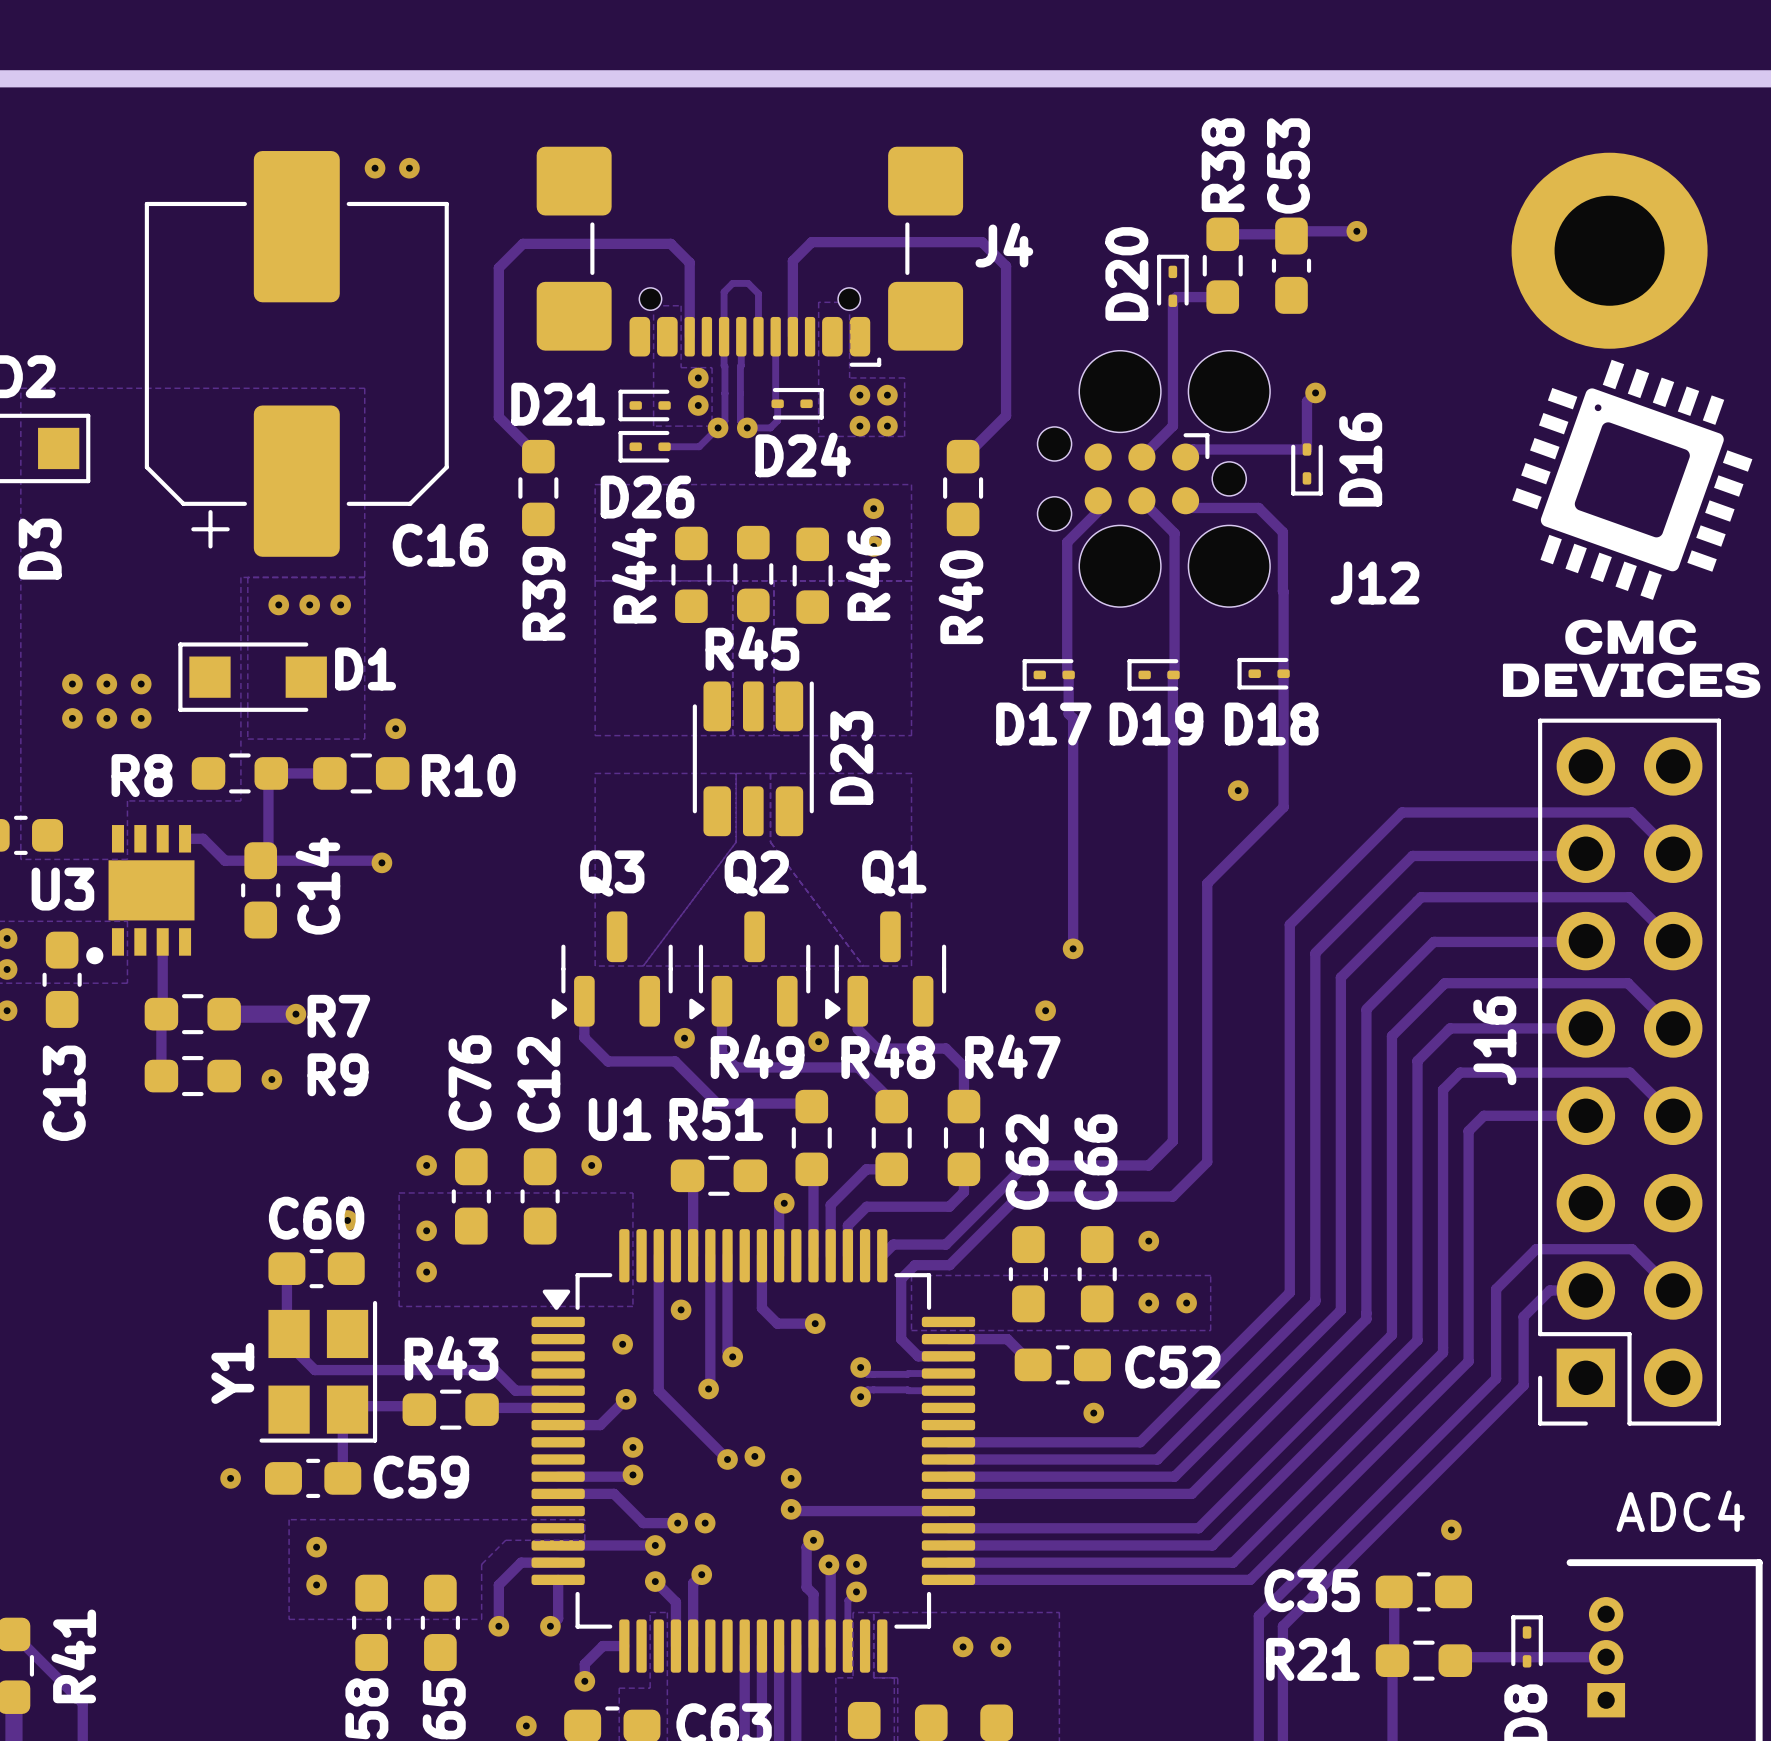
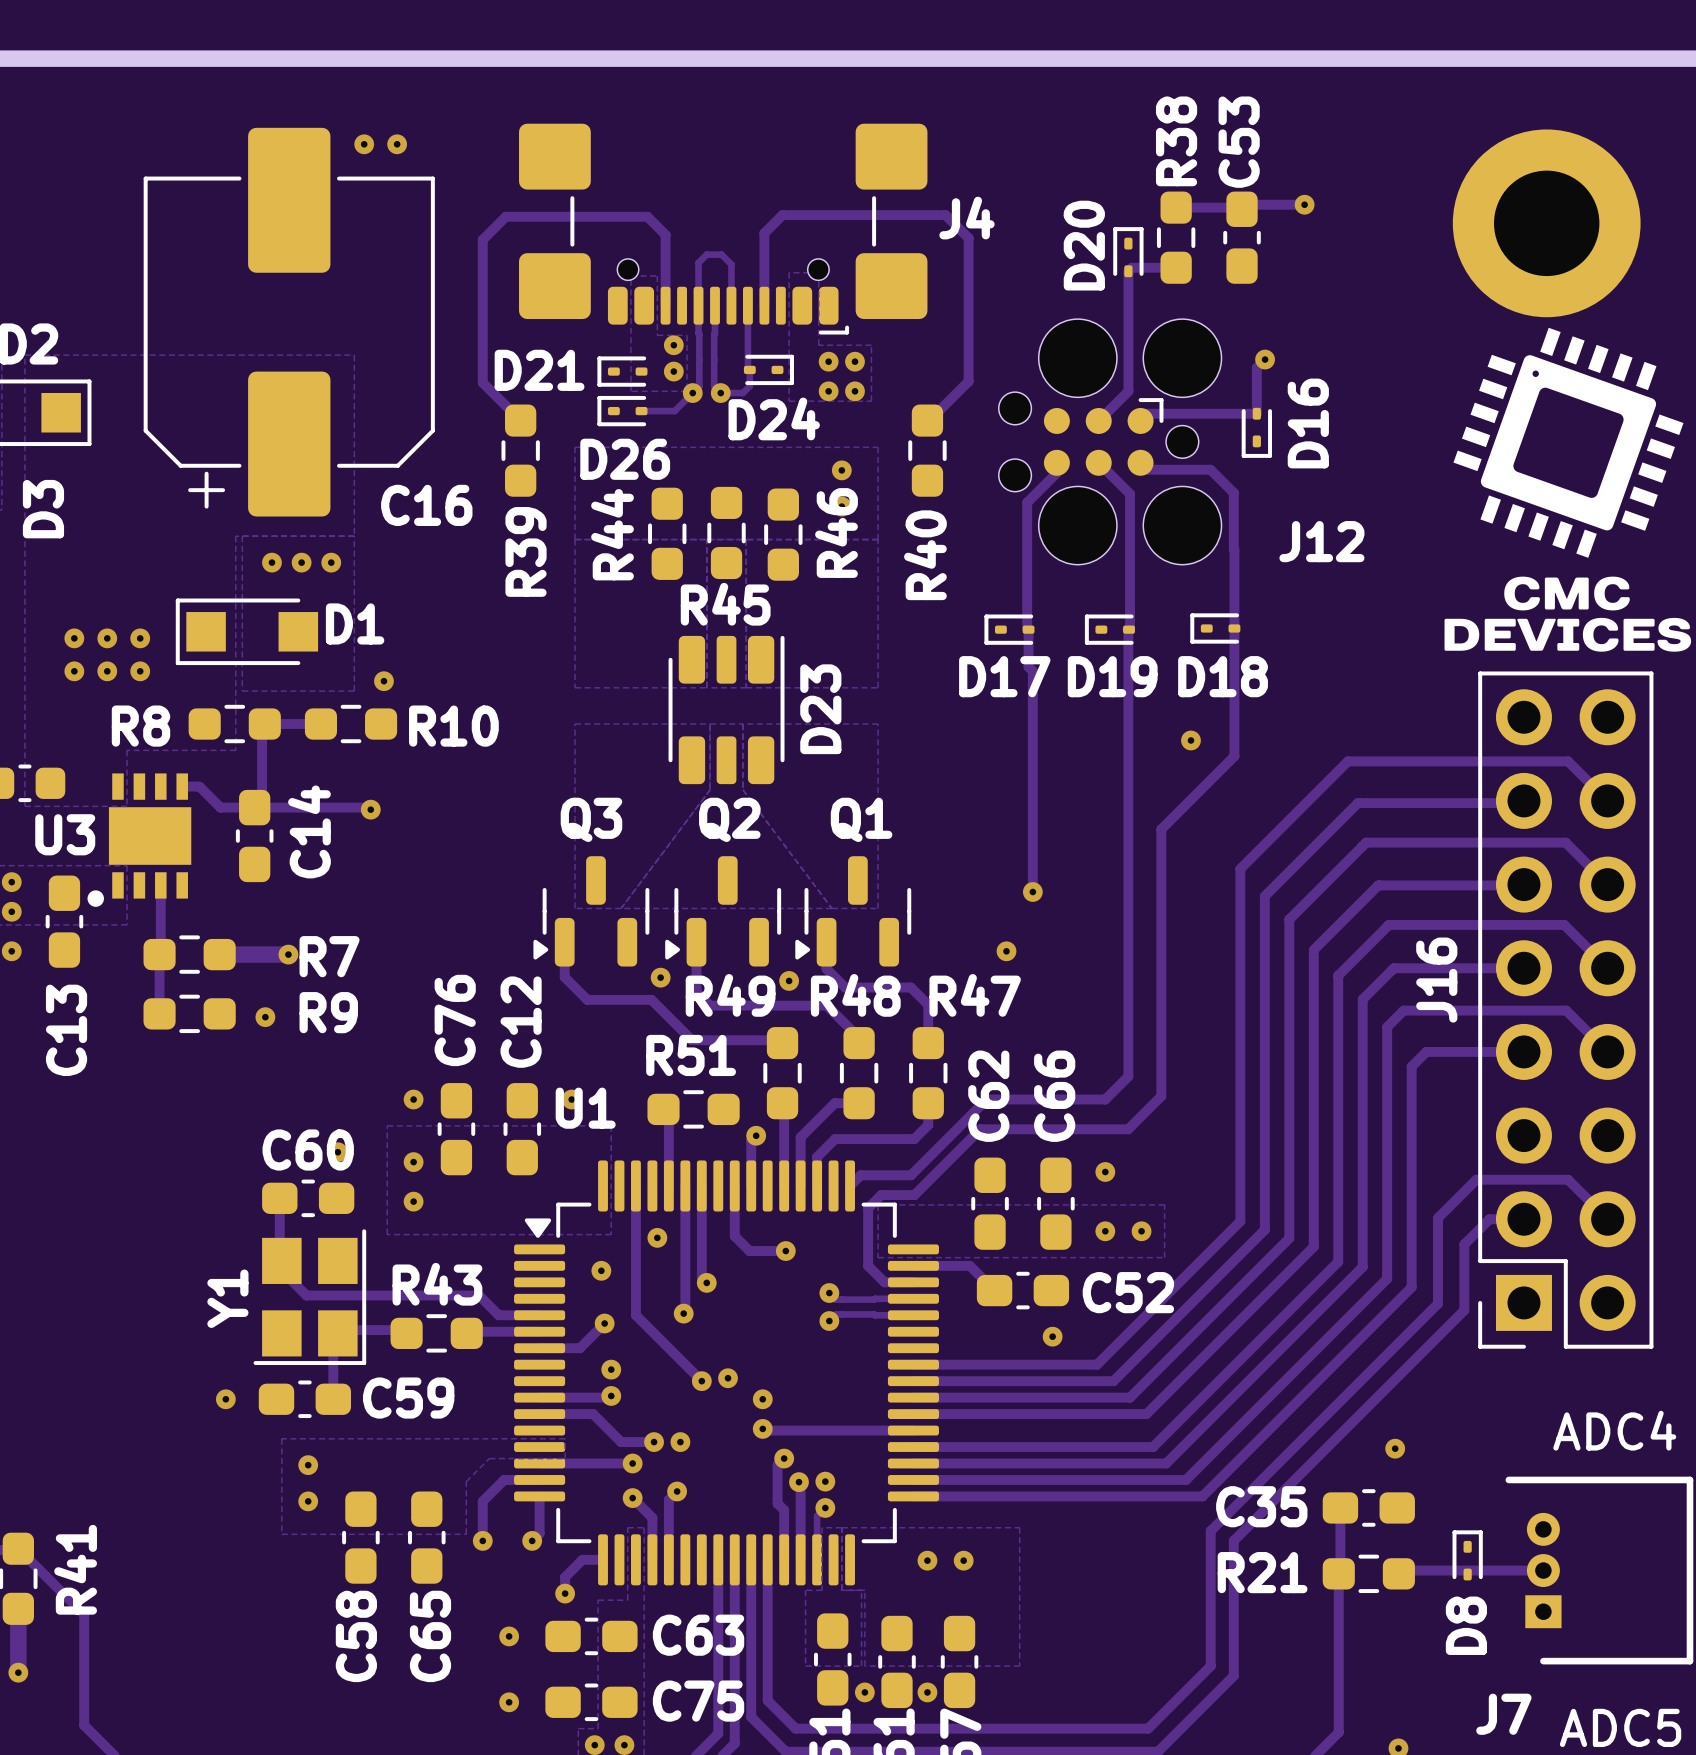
U1 name position: U1 (620, 1119) -> U1 (585, 1108)

